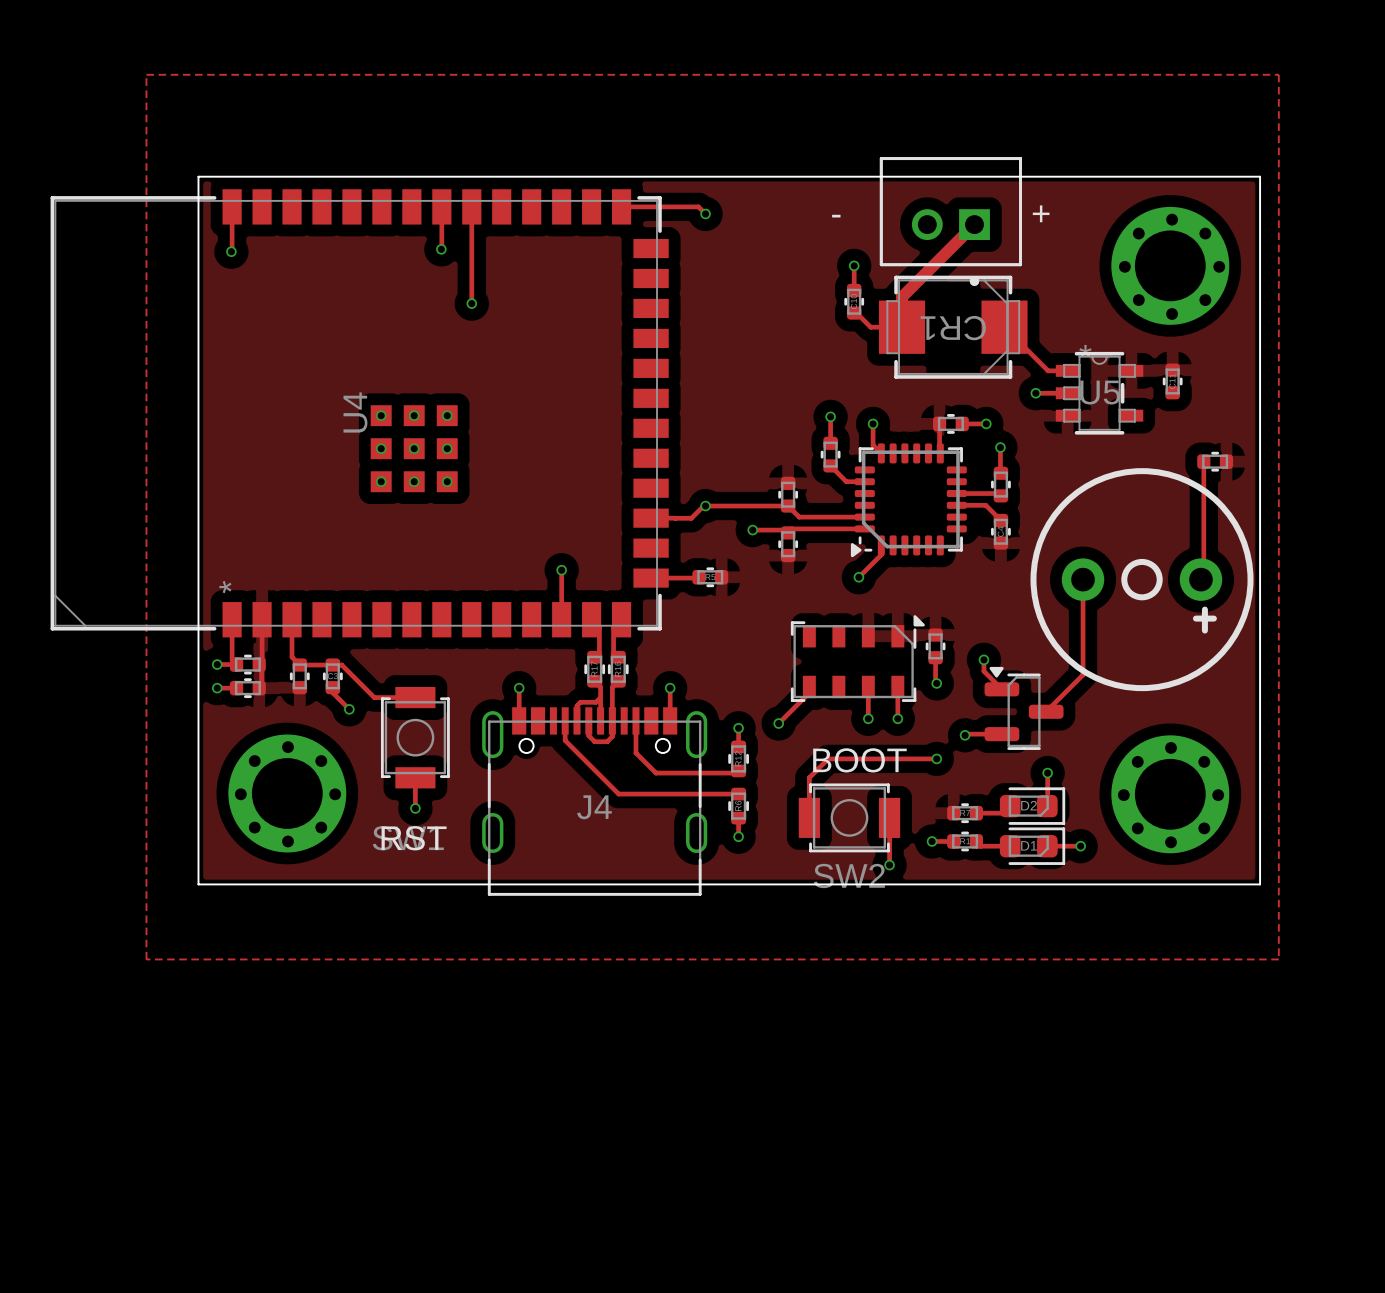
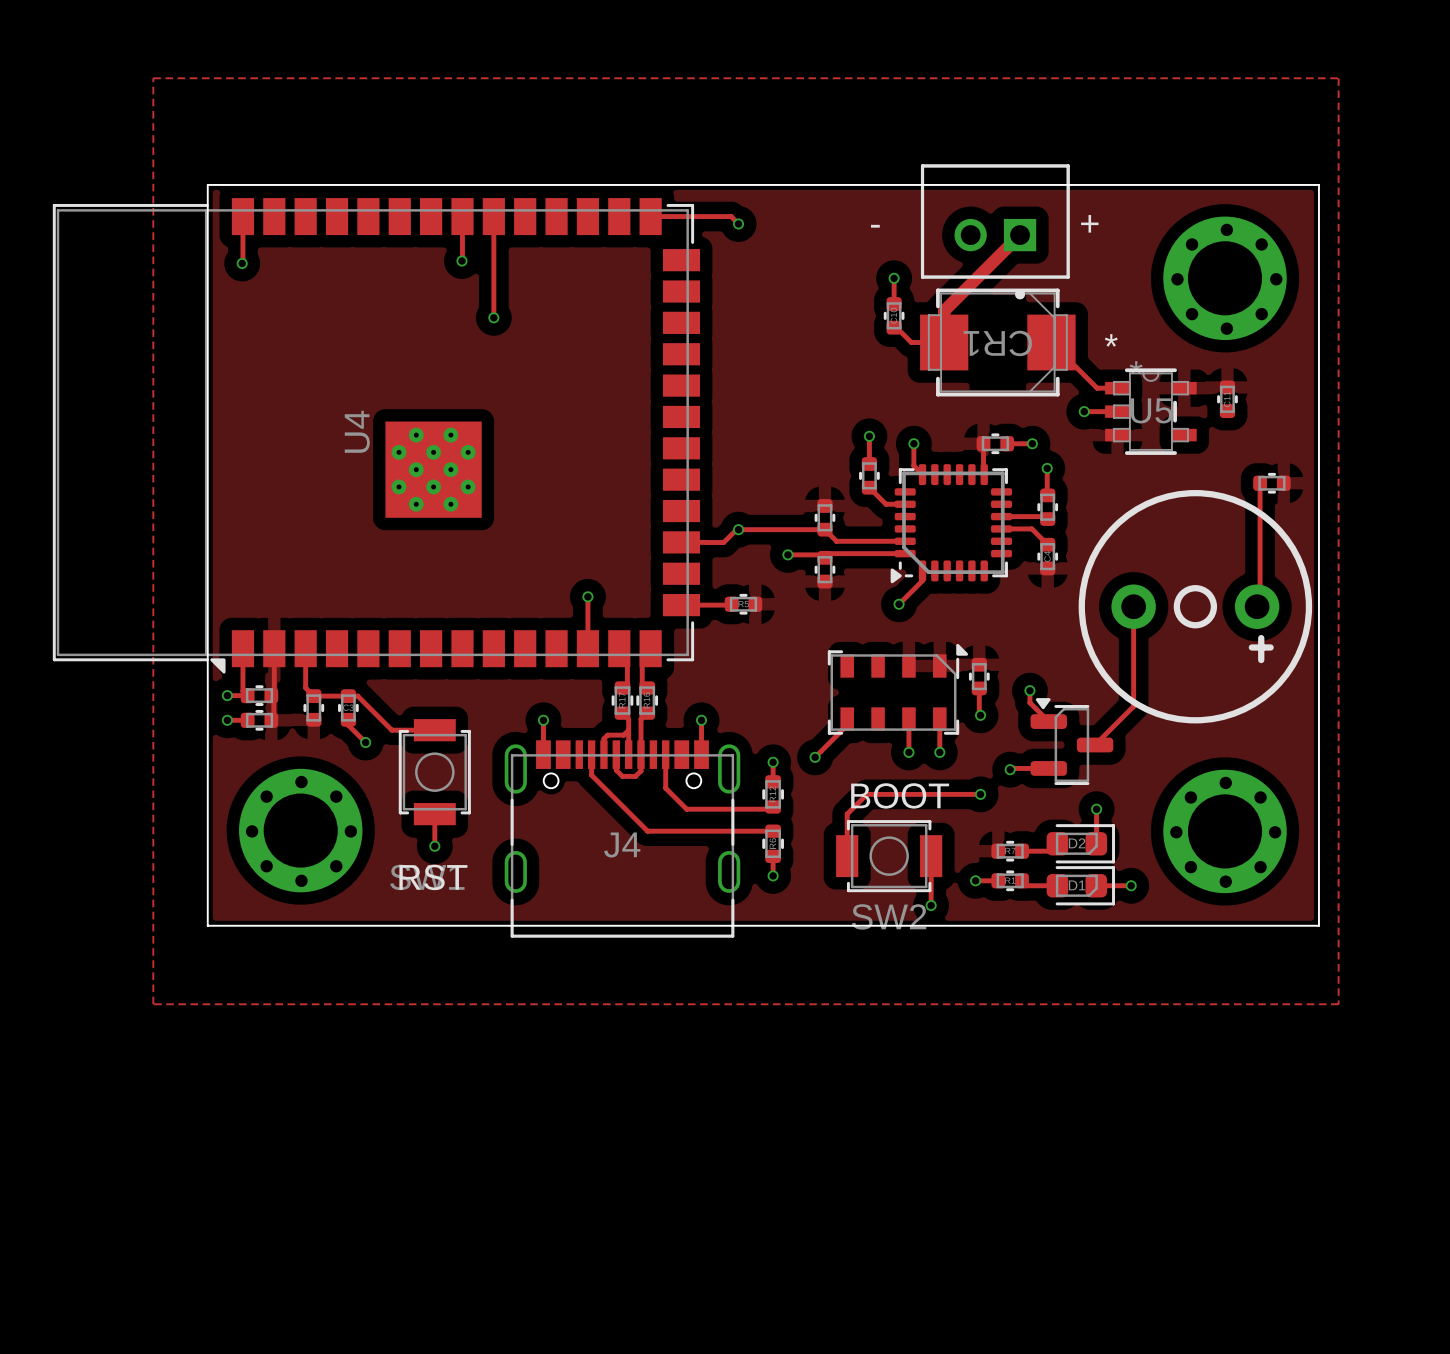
U4 footprint: [50, 189, 669, 638] -> [52, 198, 701, 674]
U5 text: none -> * (1111, 340)
via: (381, 415) -> none
via: (414, 415) -> none
via: (447, 415) -> none
via: (381, 448) -> none
via: (414, 448) -> none
via: (447, 448) -> none
via: (381, 481) -> none
via: (414, 481) -> none
via: (447, 481) -> none

